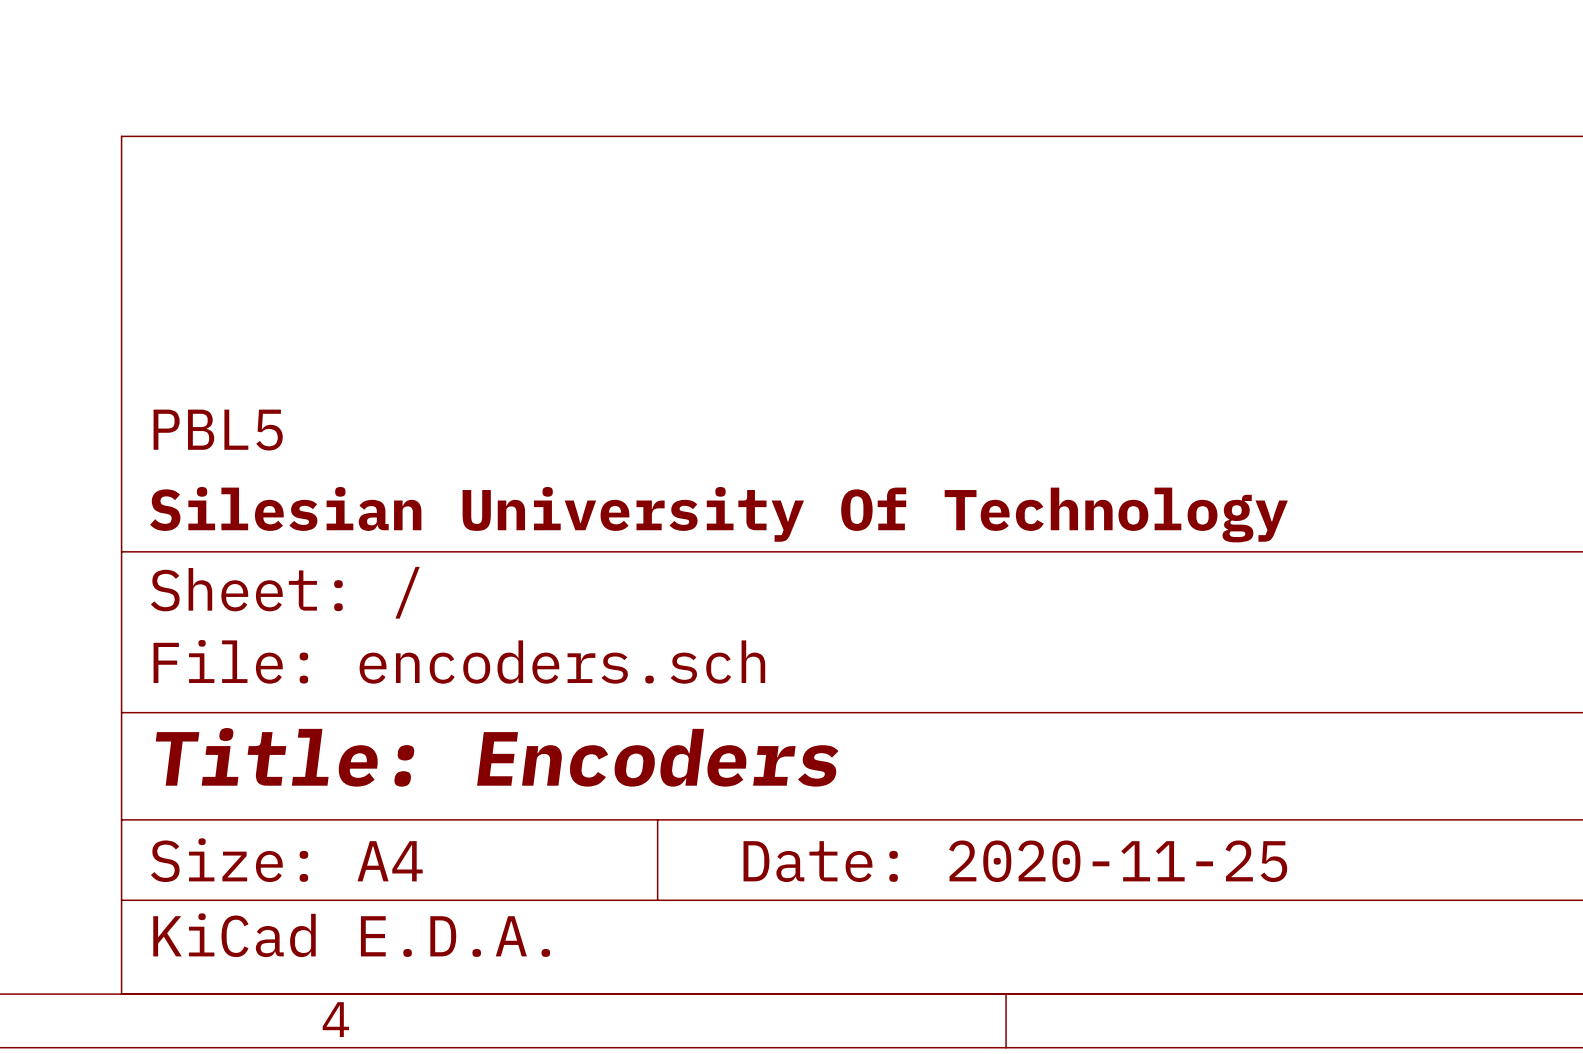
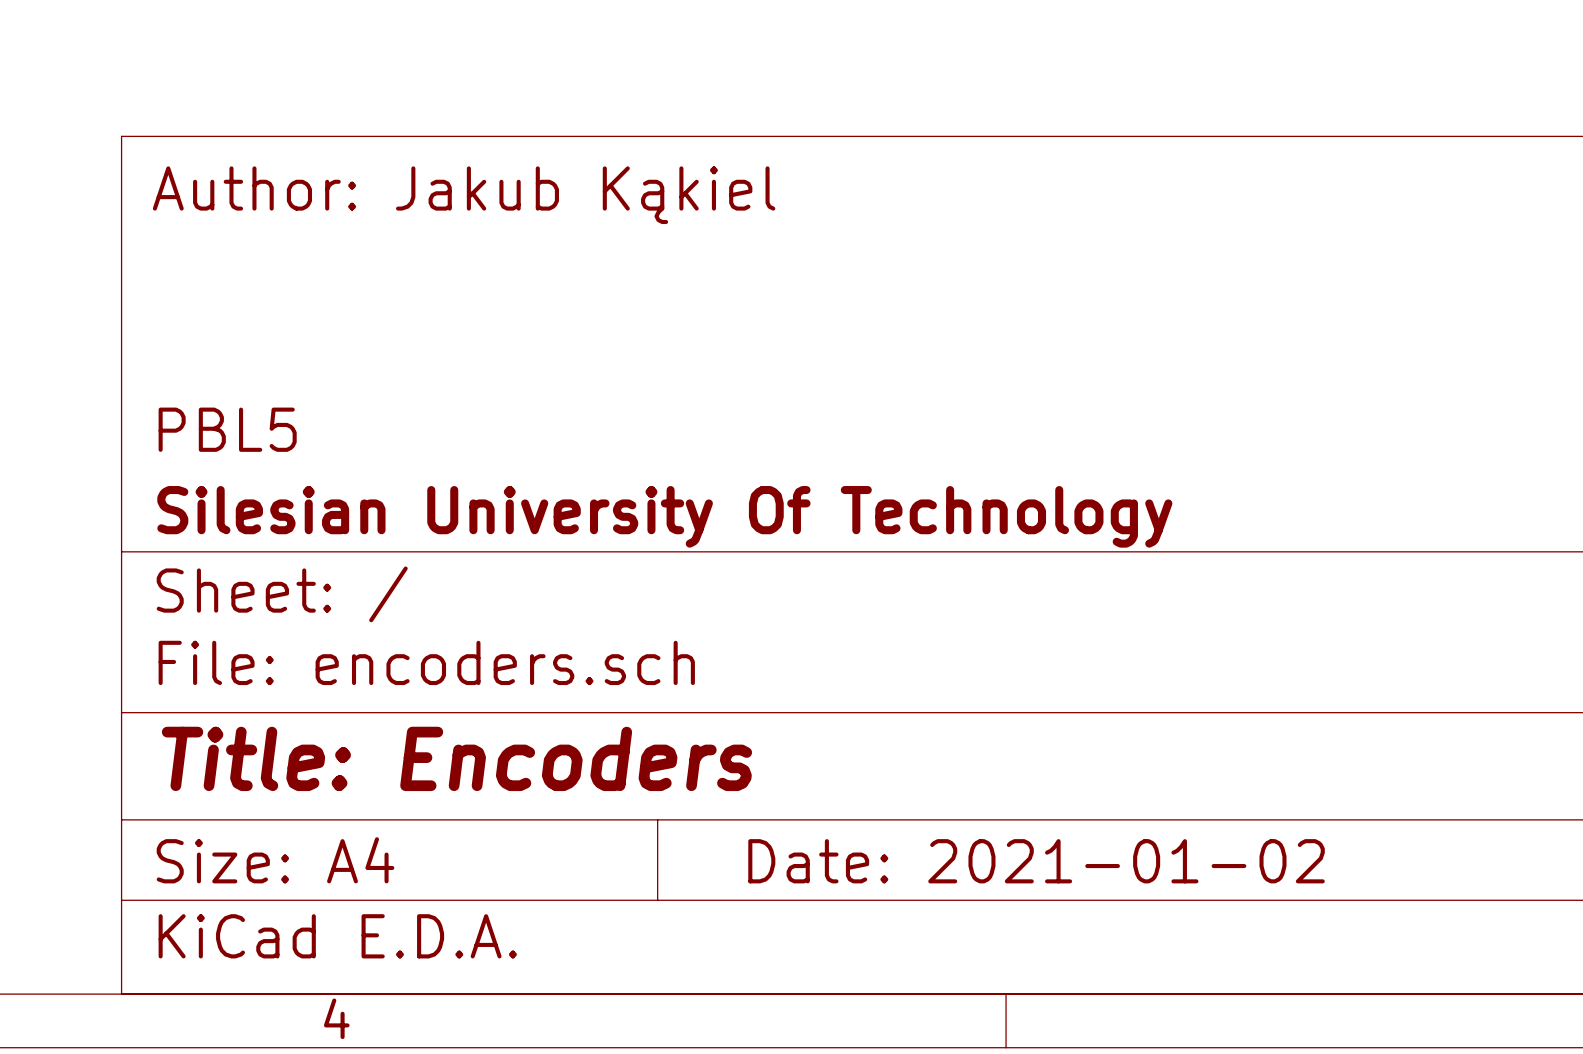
title block: none -> Author: Jakub Kąkiel (464, 195)
title block: Date: 2020-11-25 (1015, 861) -> Date: 2021-01-02 (1036, 861)

